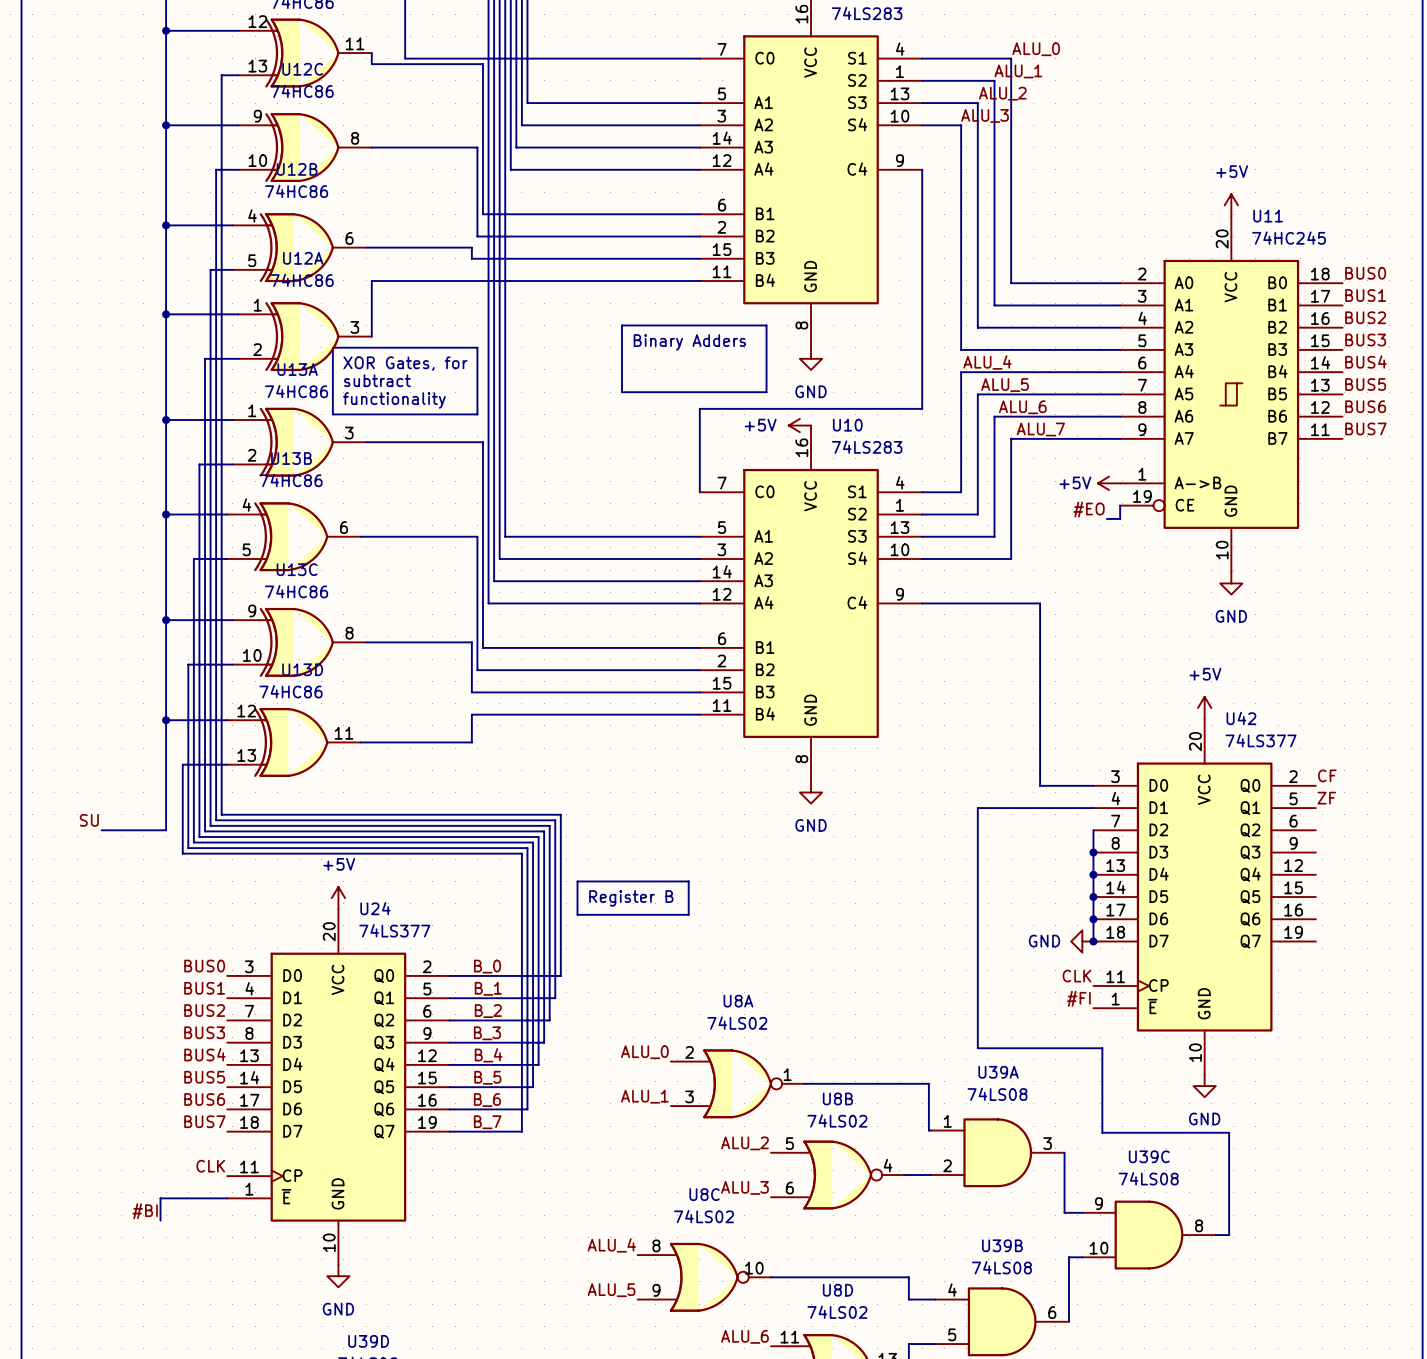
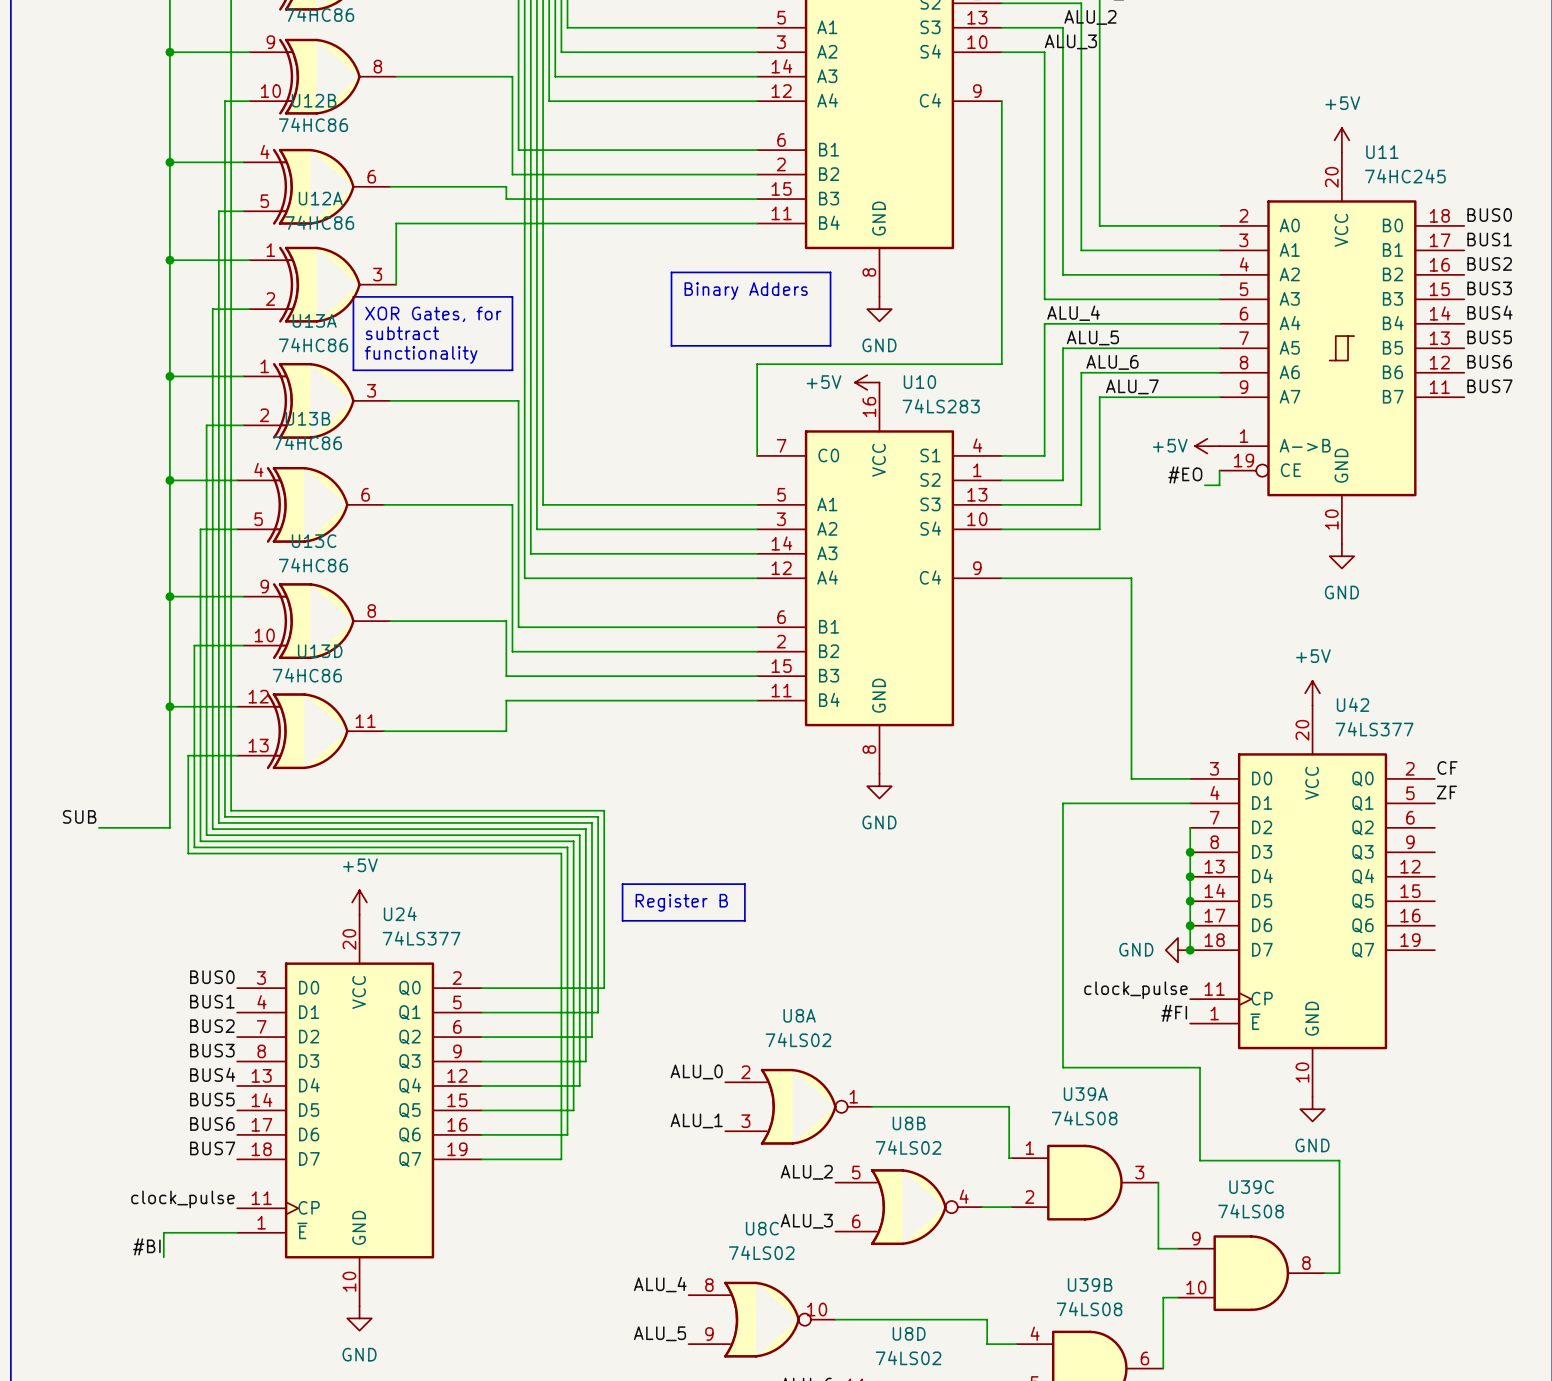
label: SU (89, 820) -> SUB (79, 816)
label: B_0 (487, 966) -> none
label: CLK (1076, 976) -> clock_pulse (1135, 990)
label: B_1 (488, 988) -> none
label: B_2 (488, 1011) -> none
label: B_3 (487, 1033) -> none
label: B_4 (488, 1055) -> none
label: B_5 (487, 1077) -> none
label: B_6 (487, 1100) -> none
label: B_7 (487, 1122) -> none
label: CLK (210, 1166) -> clock_pulse (182, 1199)

